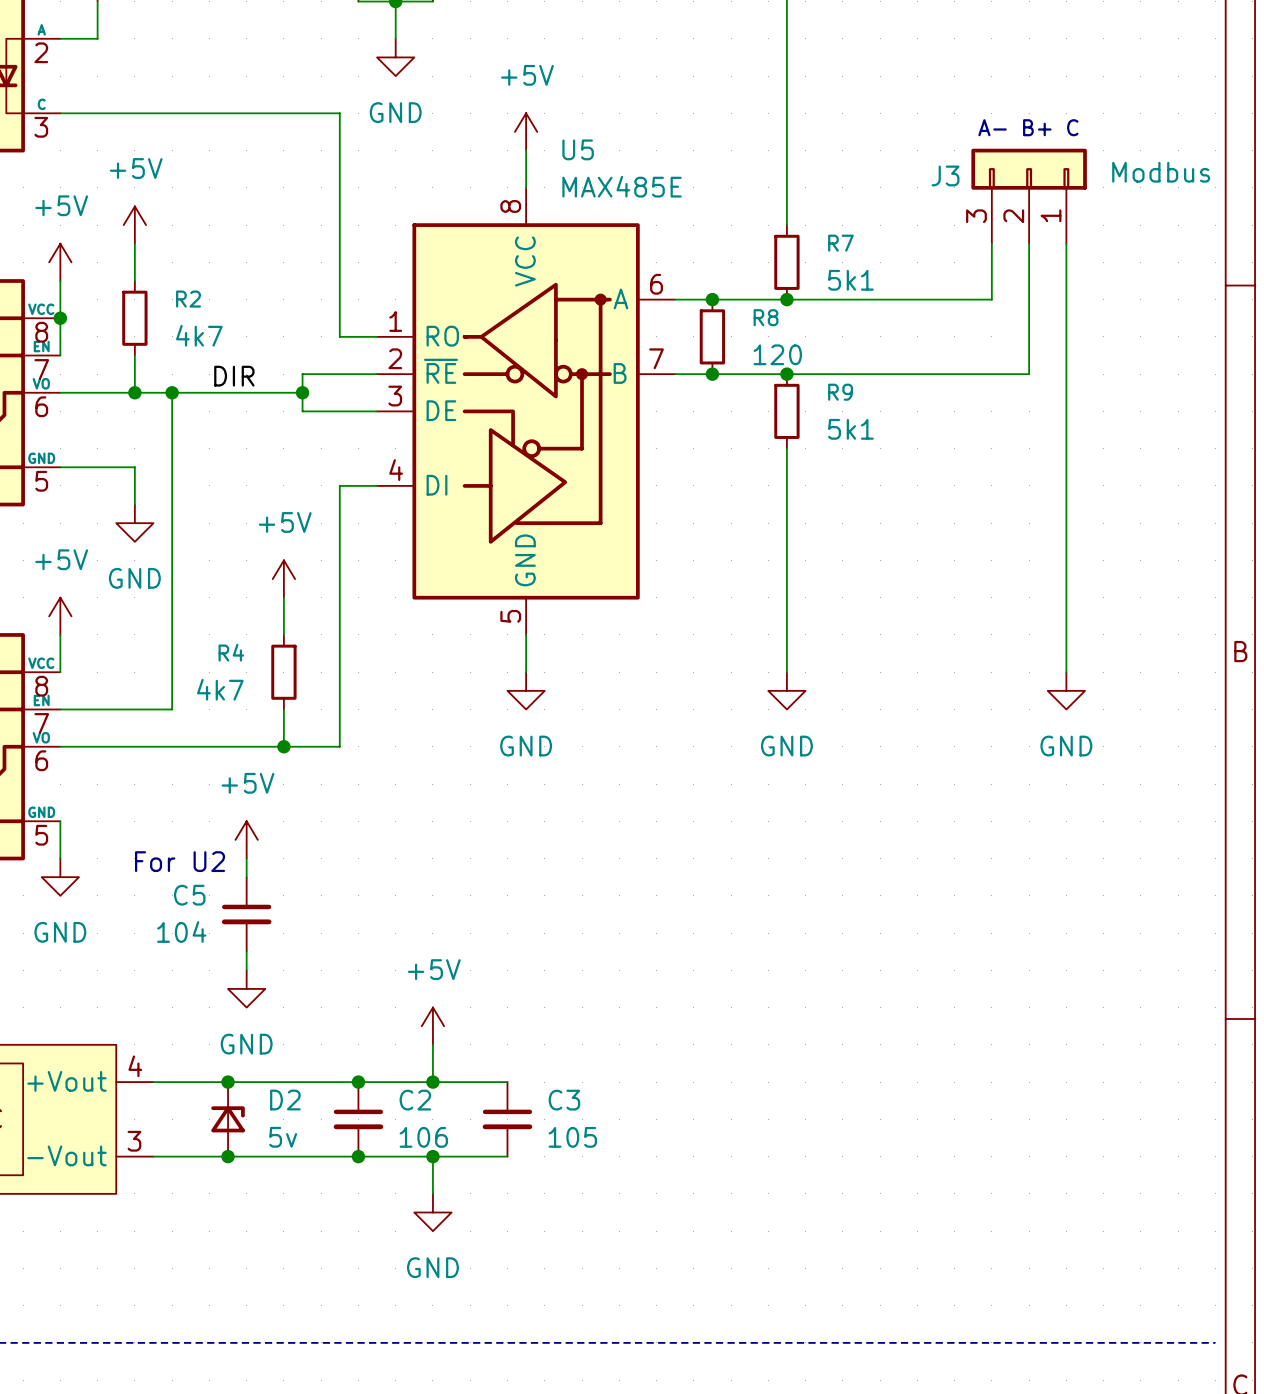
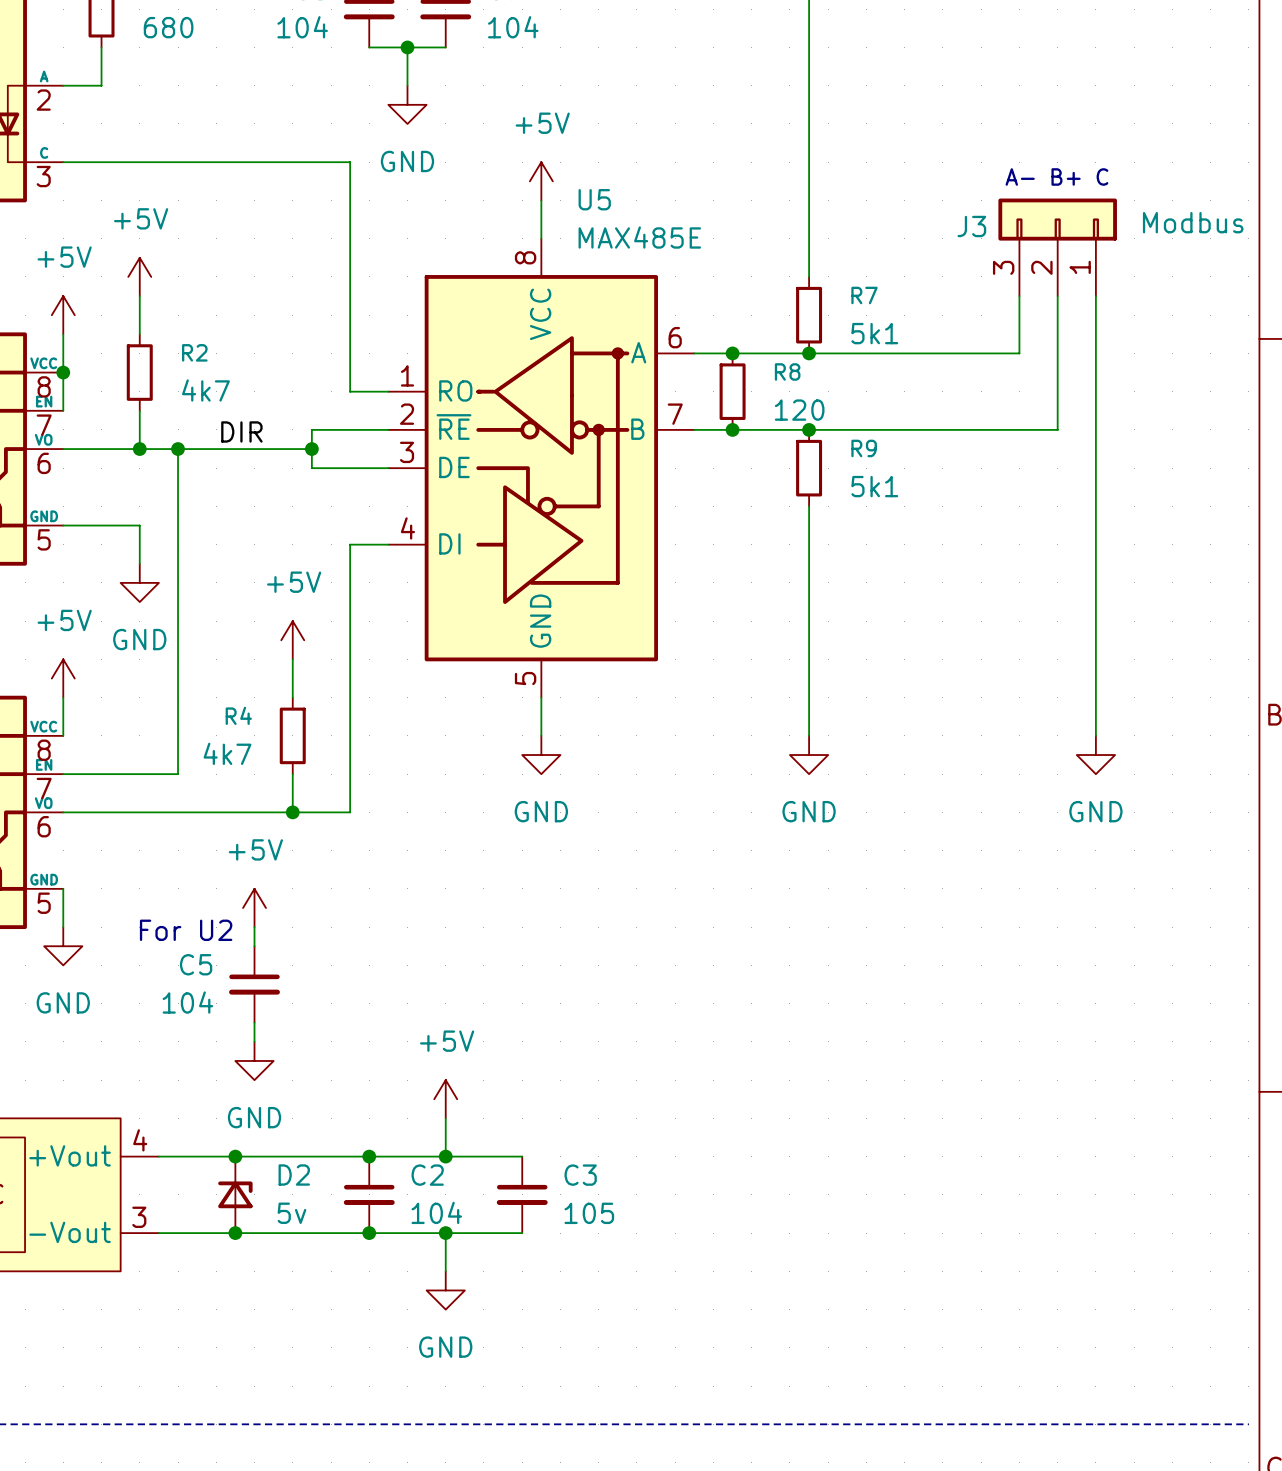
C2 value: 106 (423, 1137) -> 104 (436, 1212)

